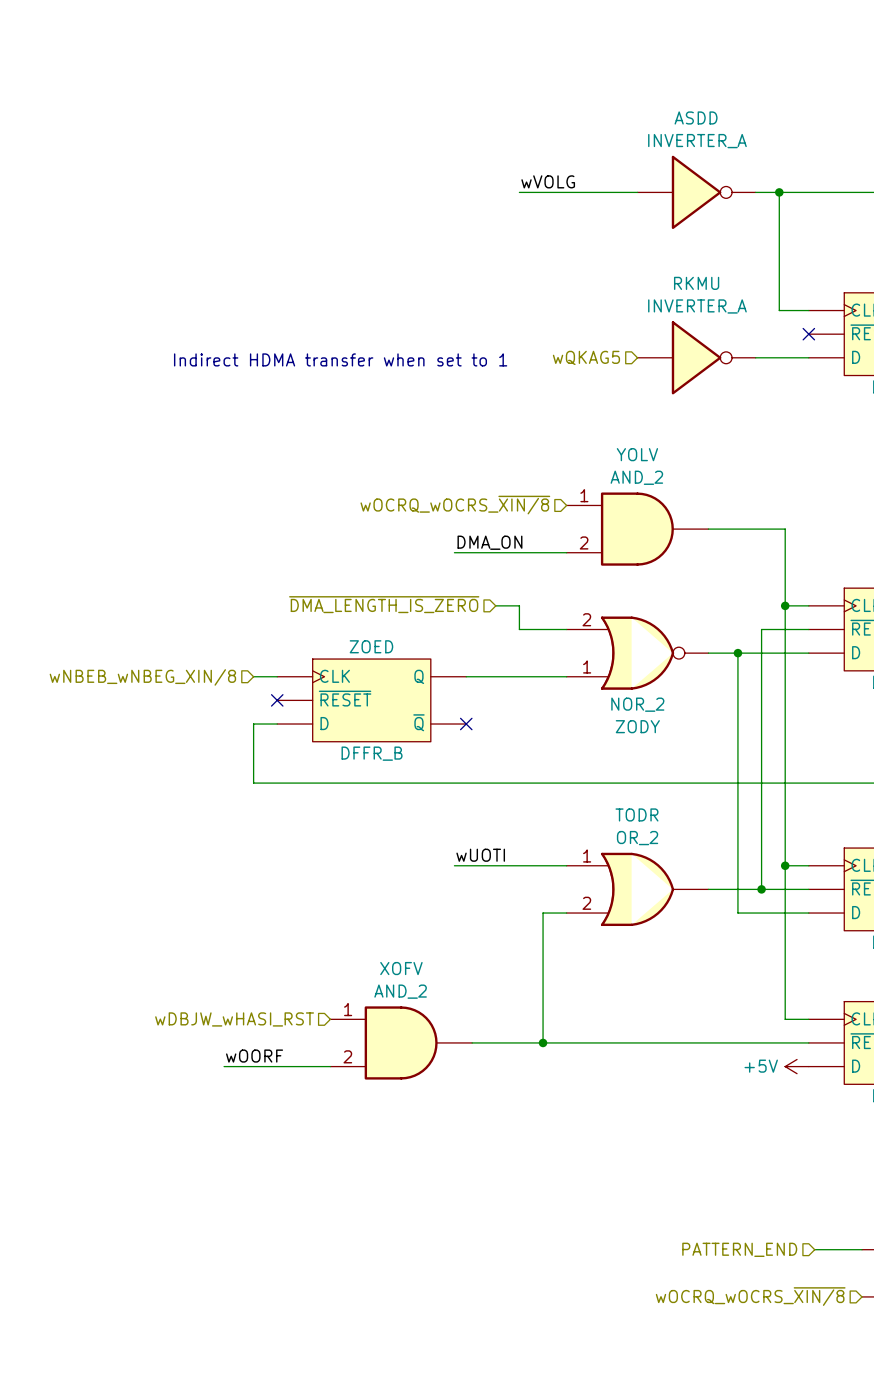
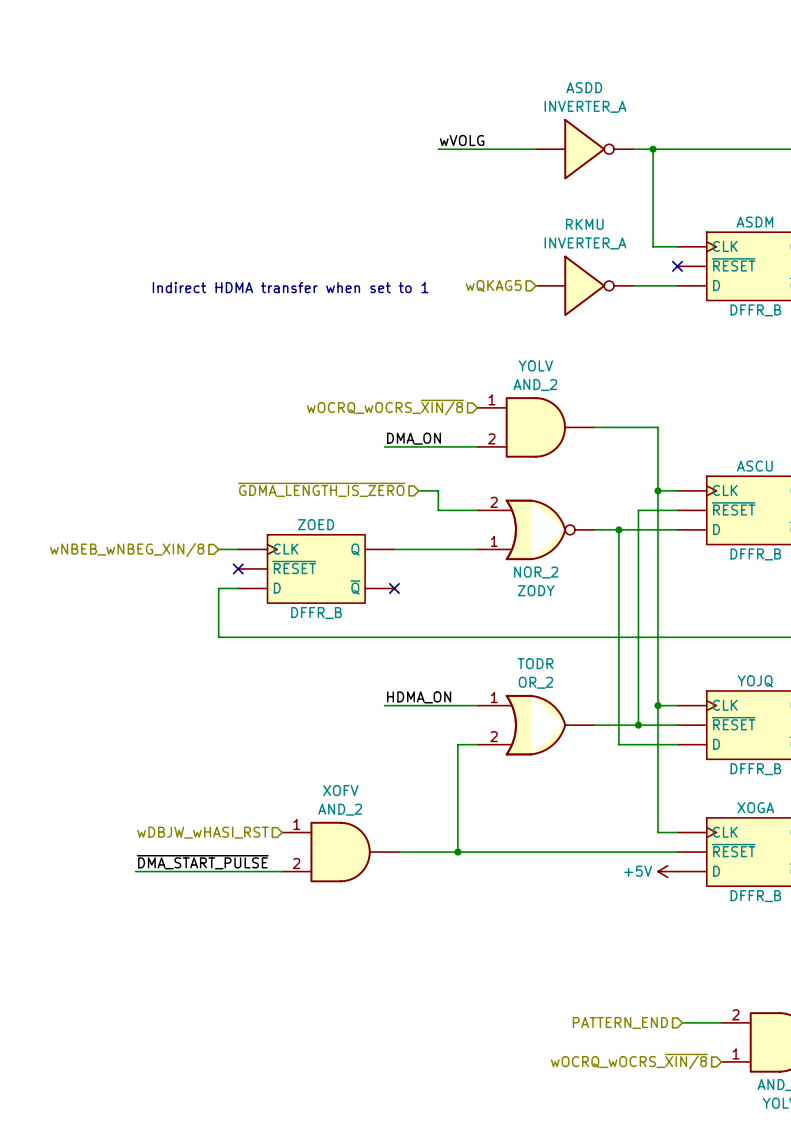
hierarchical label: ~{DMA_LENGTH_IS_ZERO} (384, 604) -> ~{GDMA_LENGTH_IS_ZERO} (321, 489)
label: wUOTI (480, 855) -> HDMA_ON (419, 697)
label: none -> ~{DMA_START_PULSE} (202, 862)
label: wOORF (254, 1056) -> none
wire: none -> (135, 871) (194, 871)

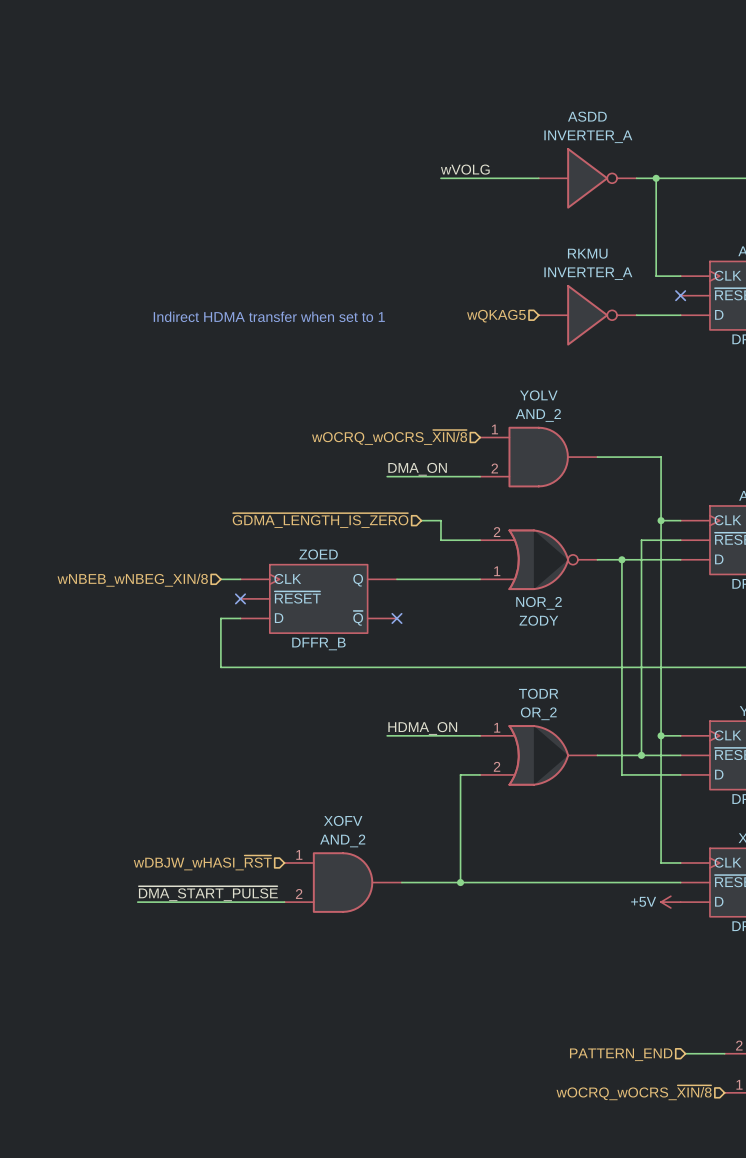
hierarchical label: wDBJW_wHASI_RST (202, 832) -> wDBJW_wHASI_~{RST} (202, 862)

